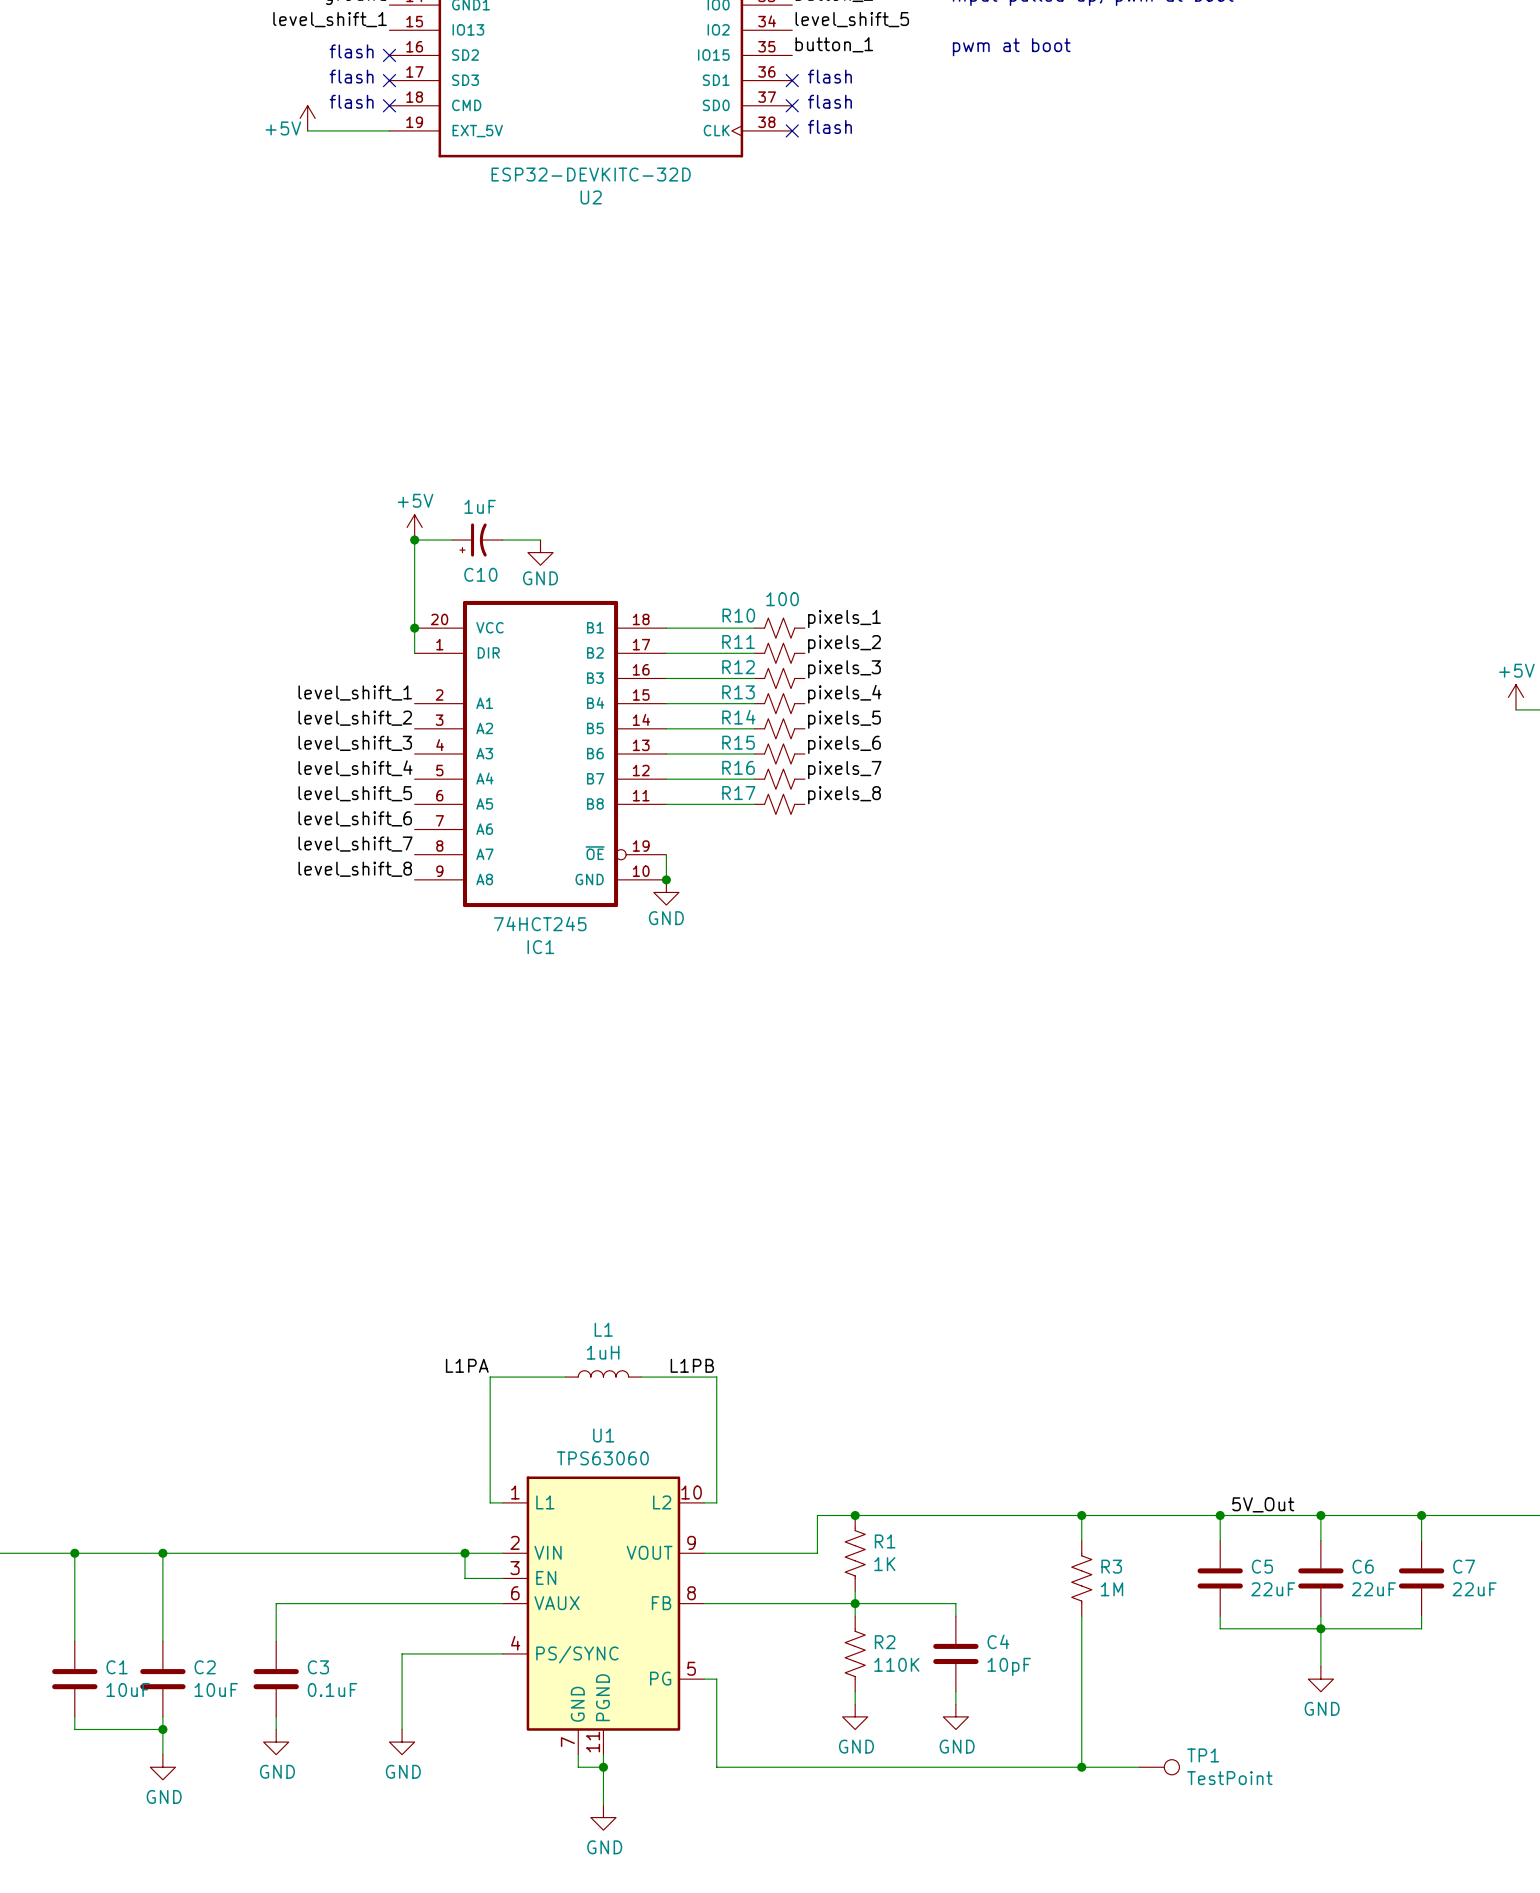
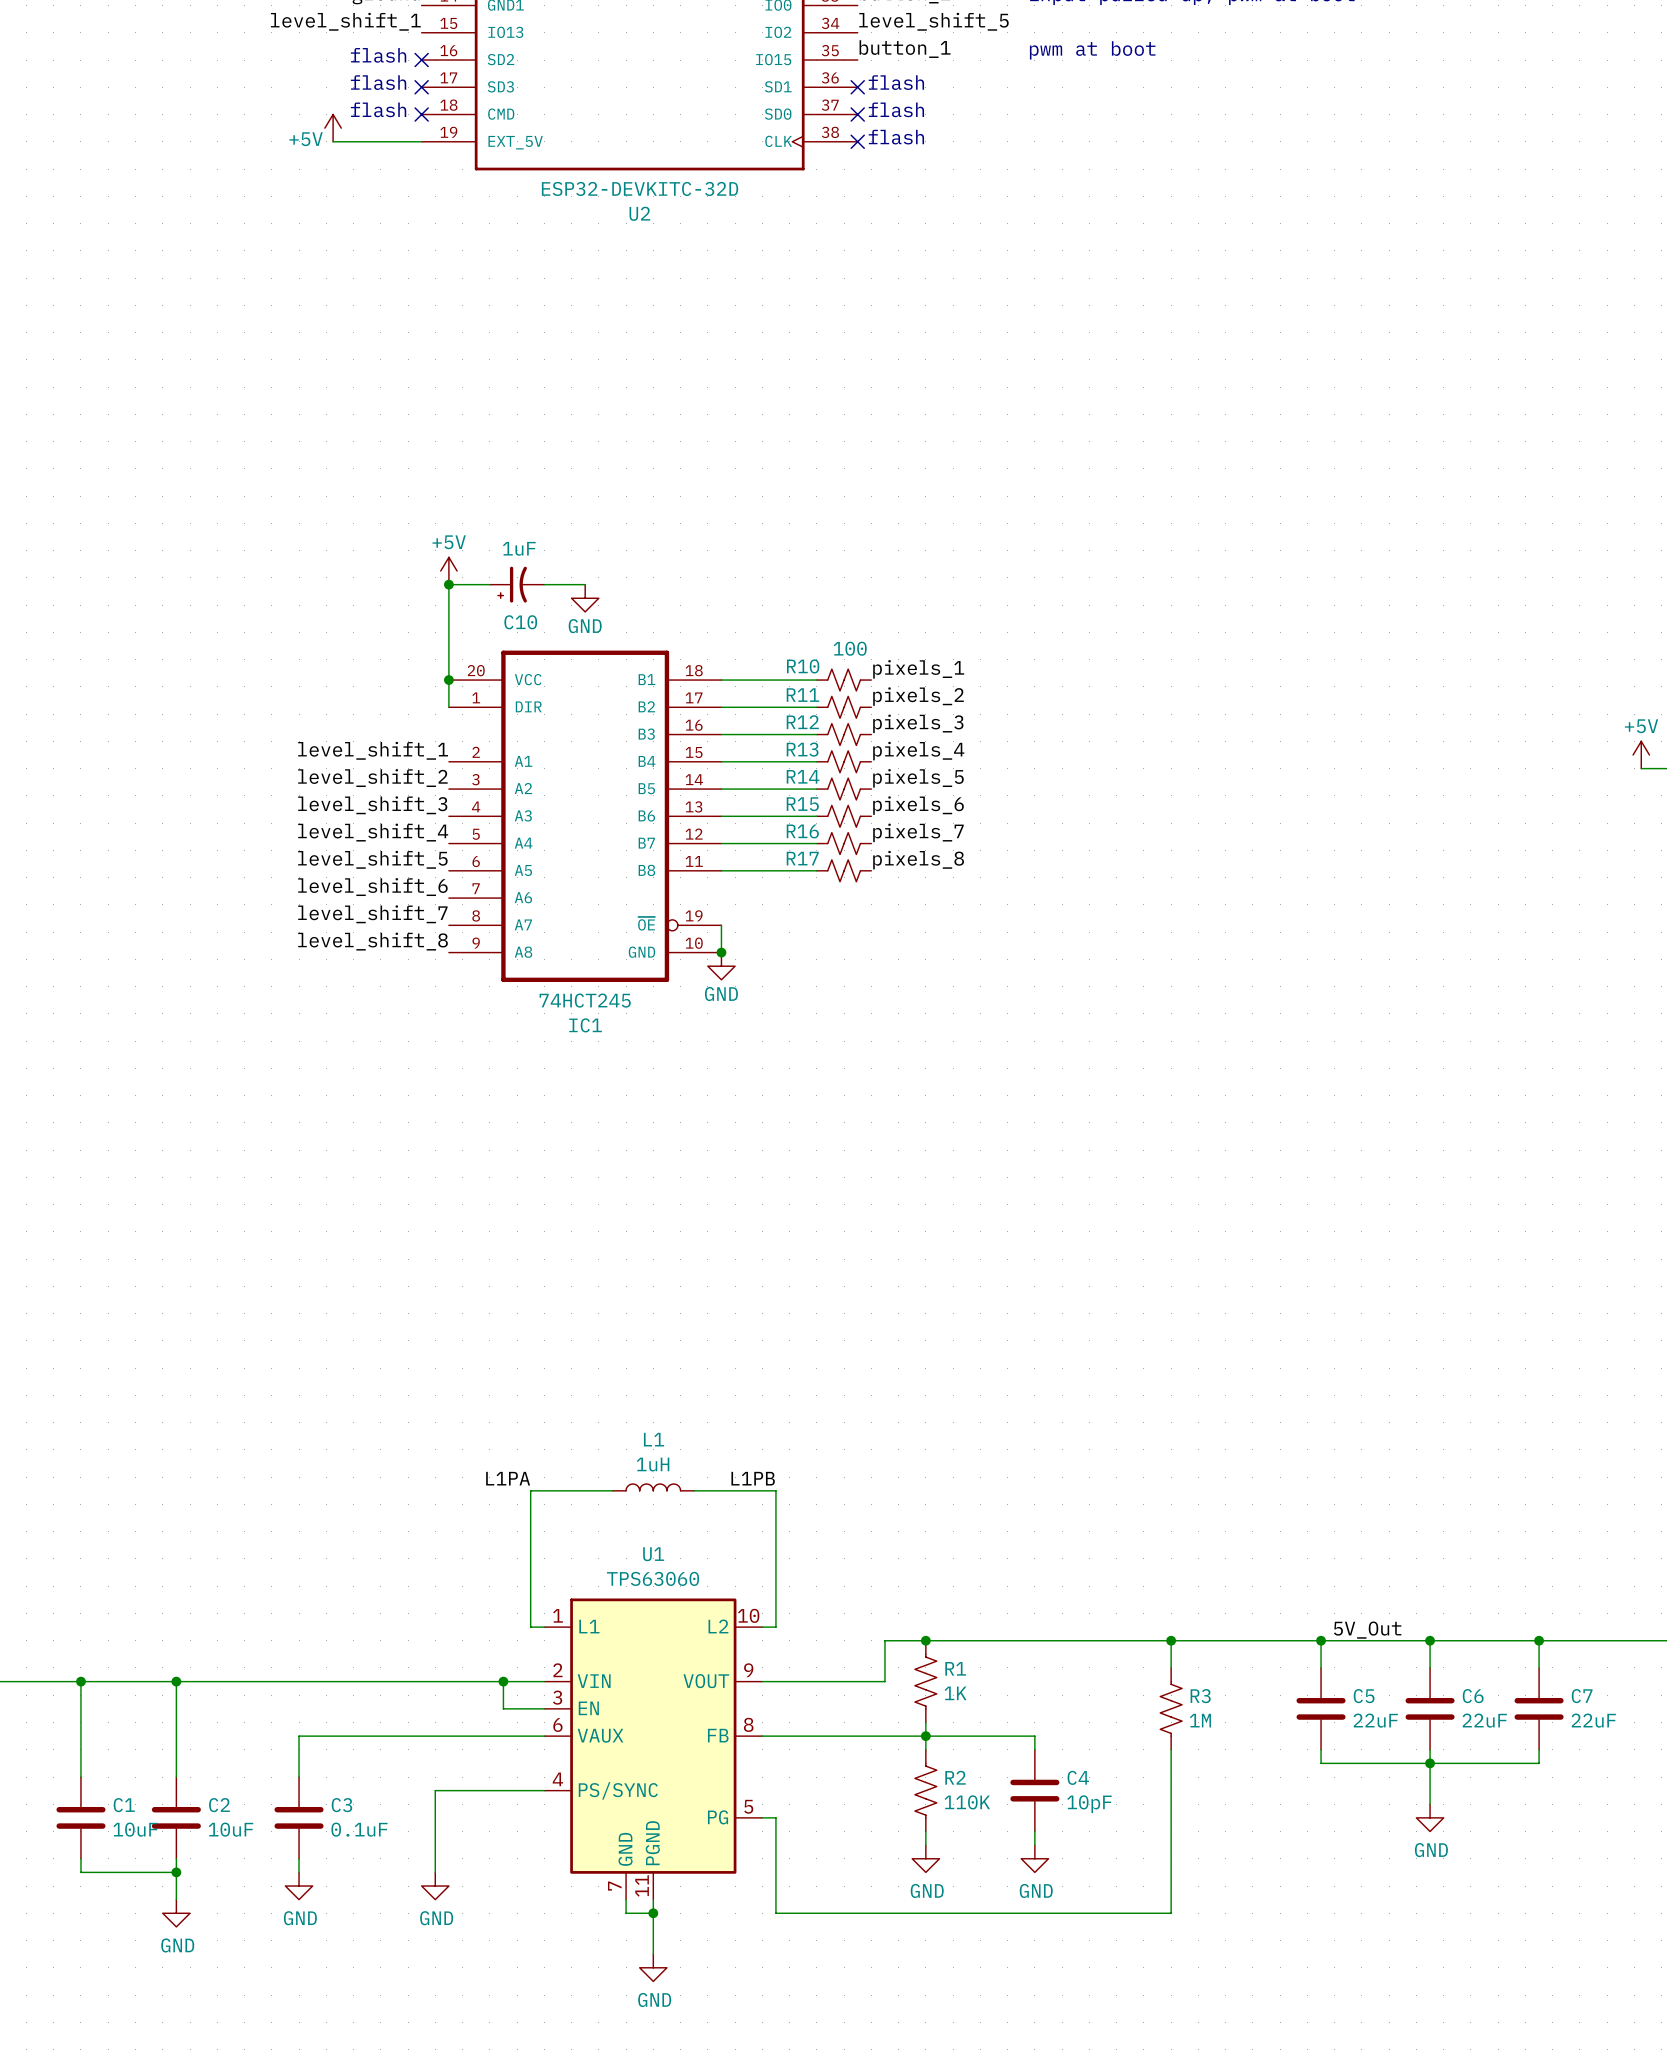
wire: (1081, 1767) (1139, 1767) -> none
junction: (1081, 1767) -> none
TP1: TestPoint (1159, 1767) -> none

